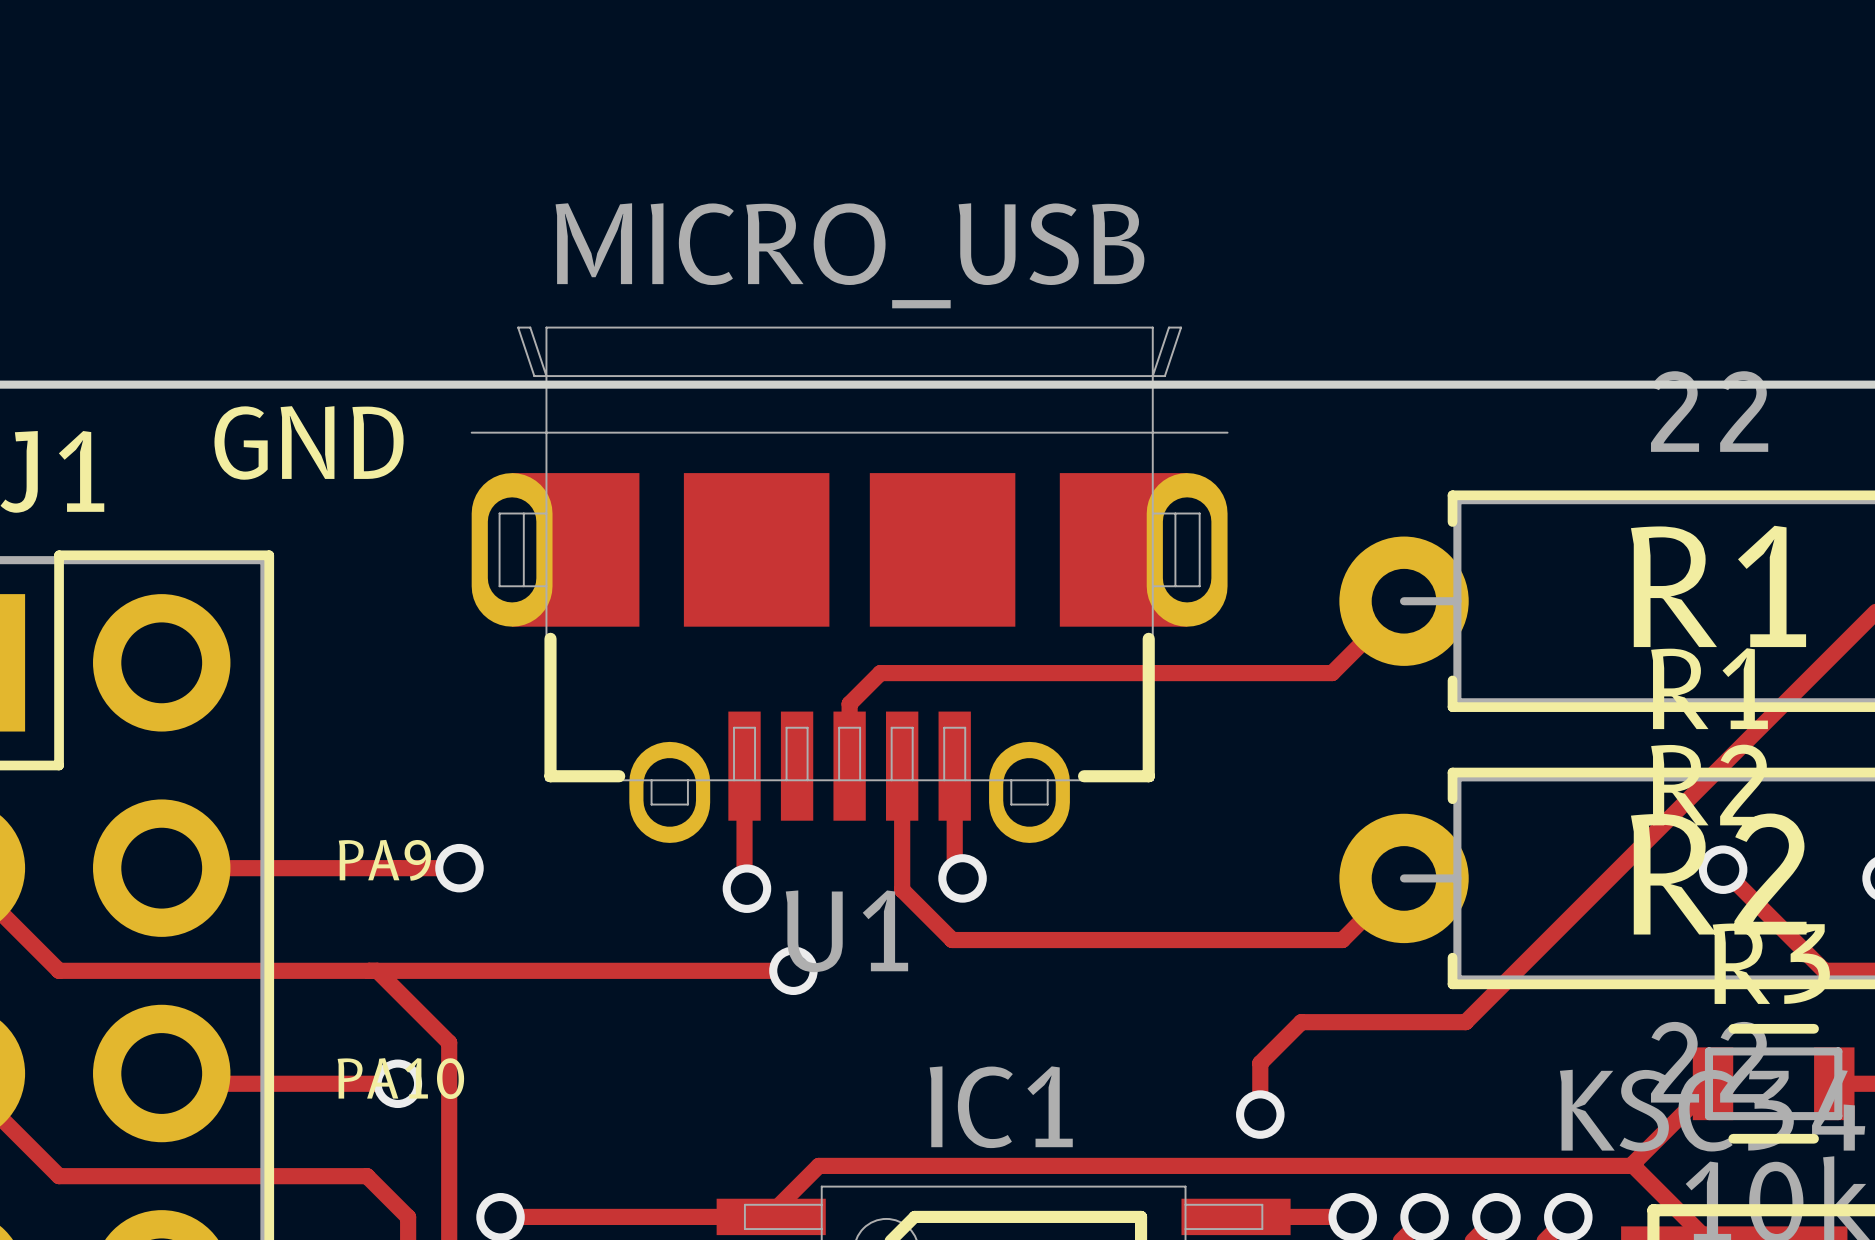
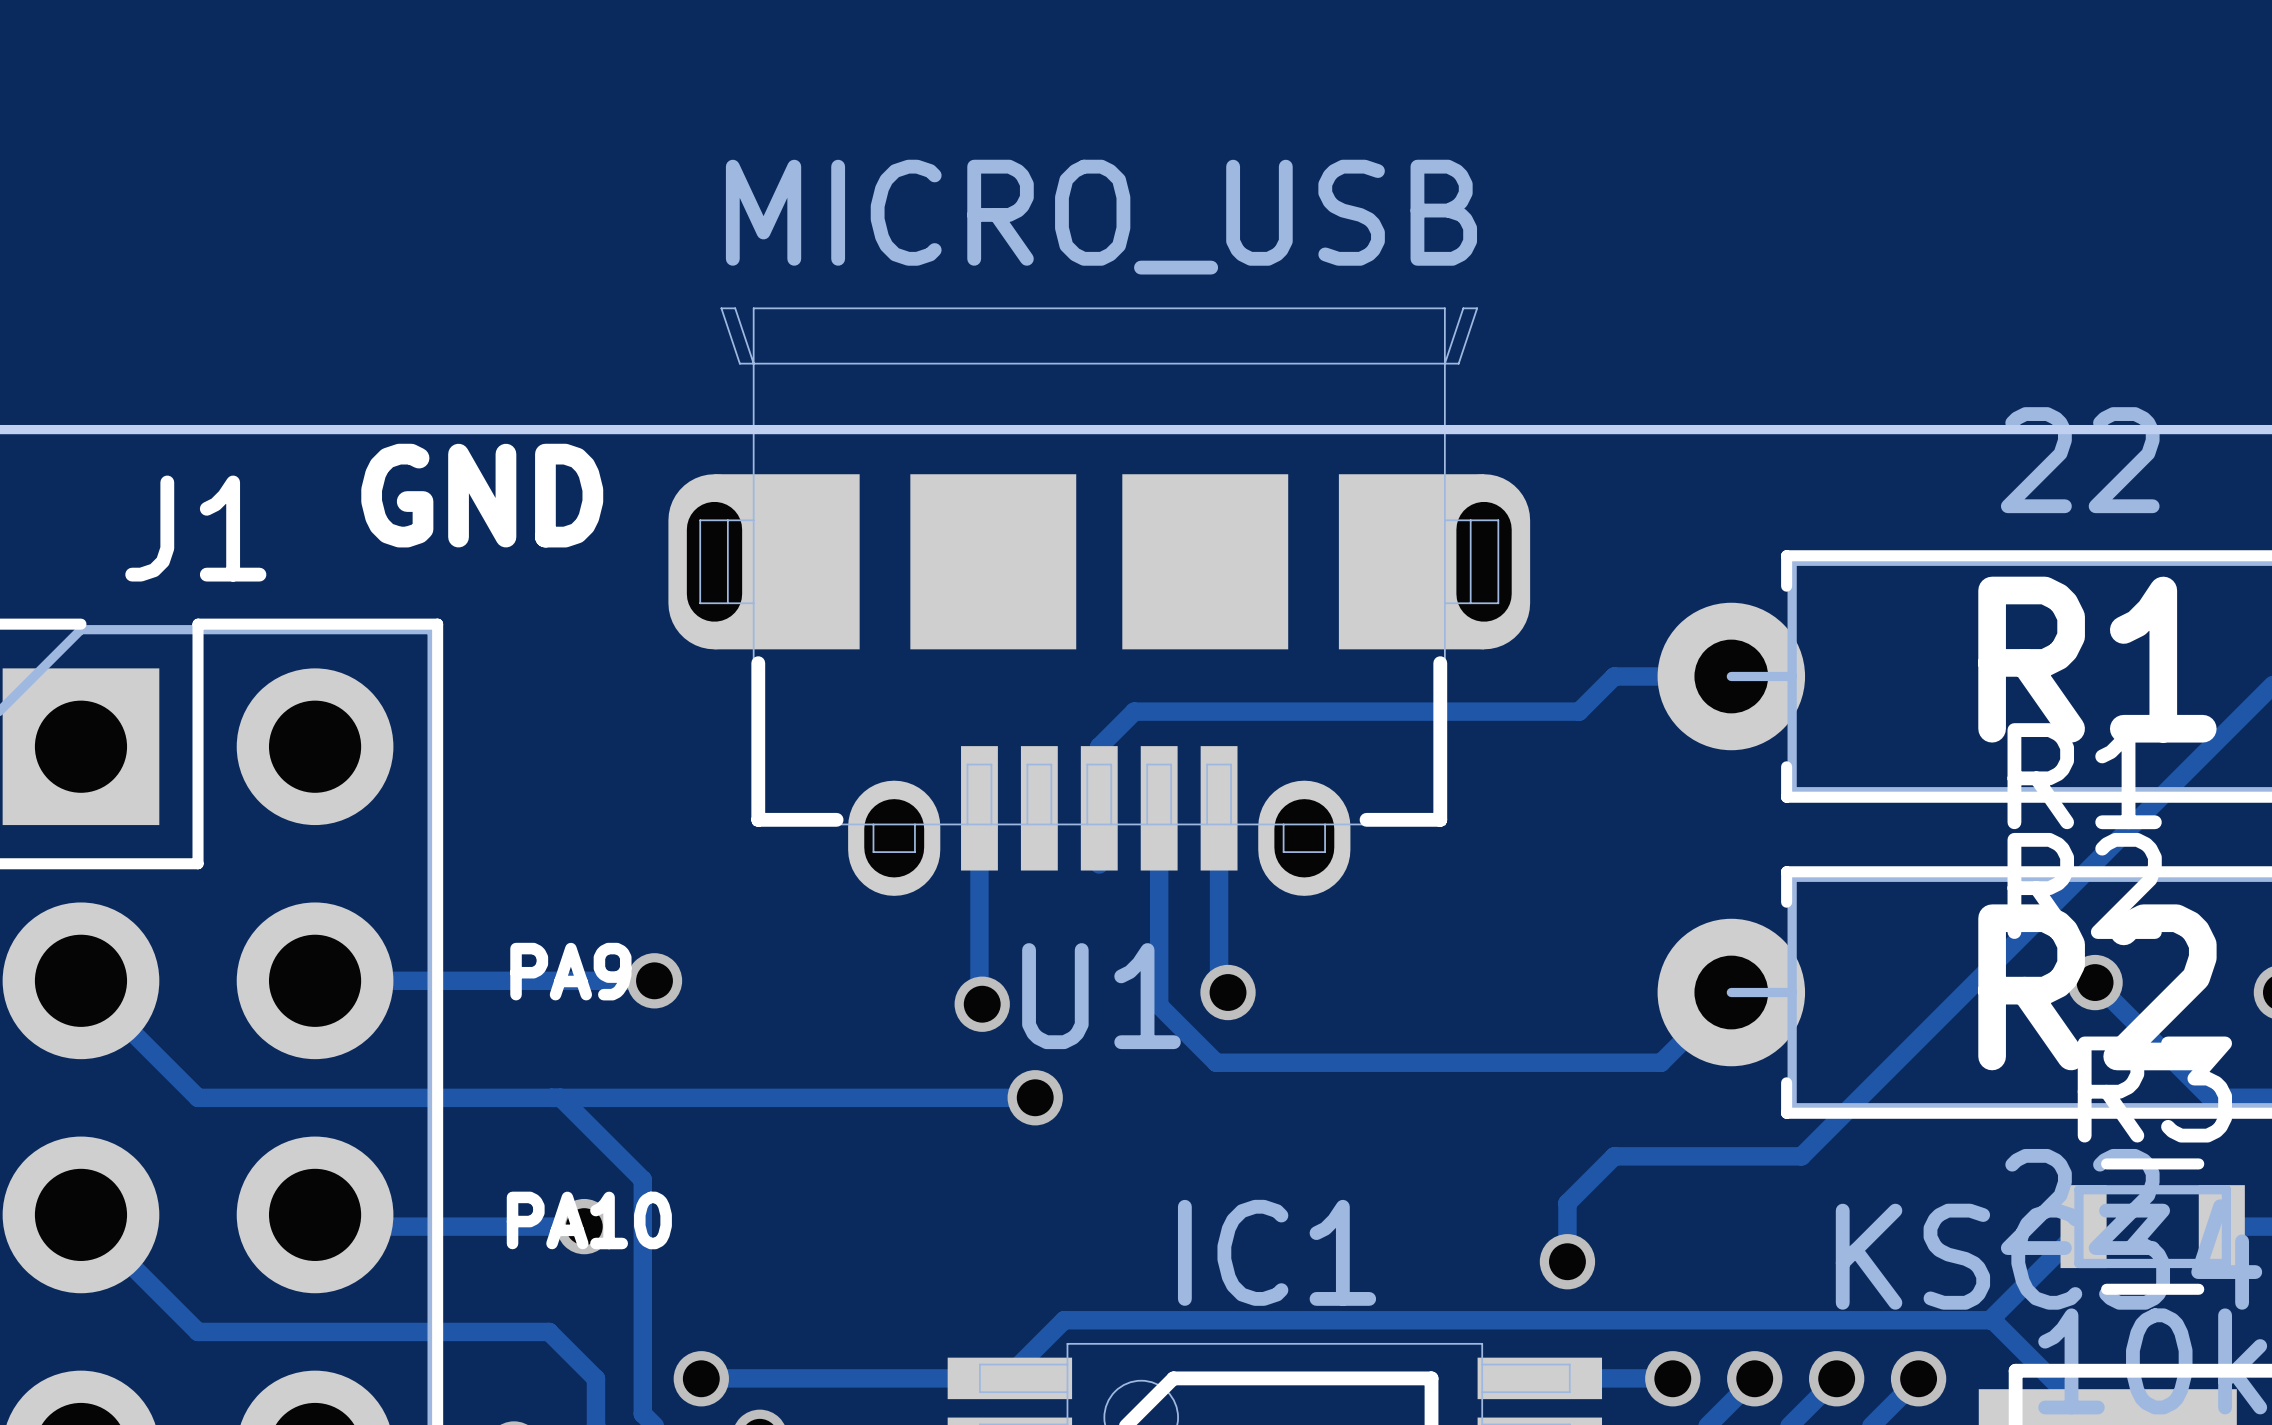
U1 position: (849, 585) -> (1099, 601)
track: (1404, 601) (1332, 673) (880, 673) (849, 703) -> (1731, 676) (1614, 676) (1579, 711) (1134, 711) (1099, 746) (1099, 793)

